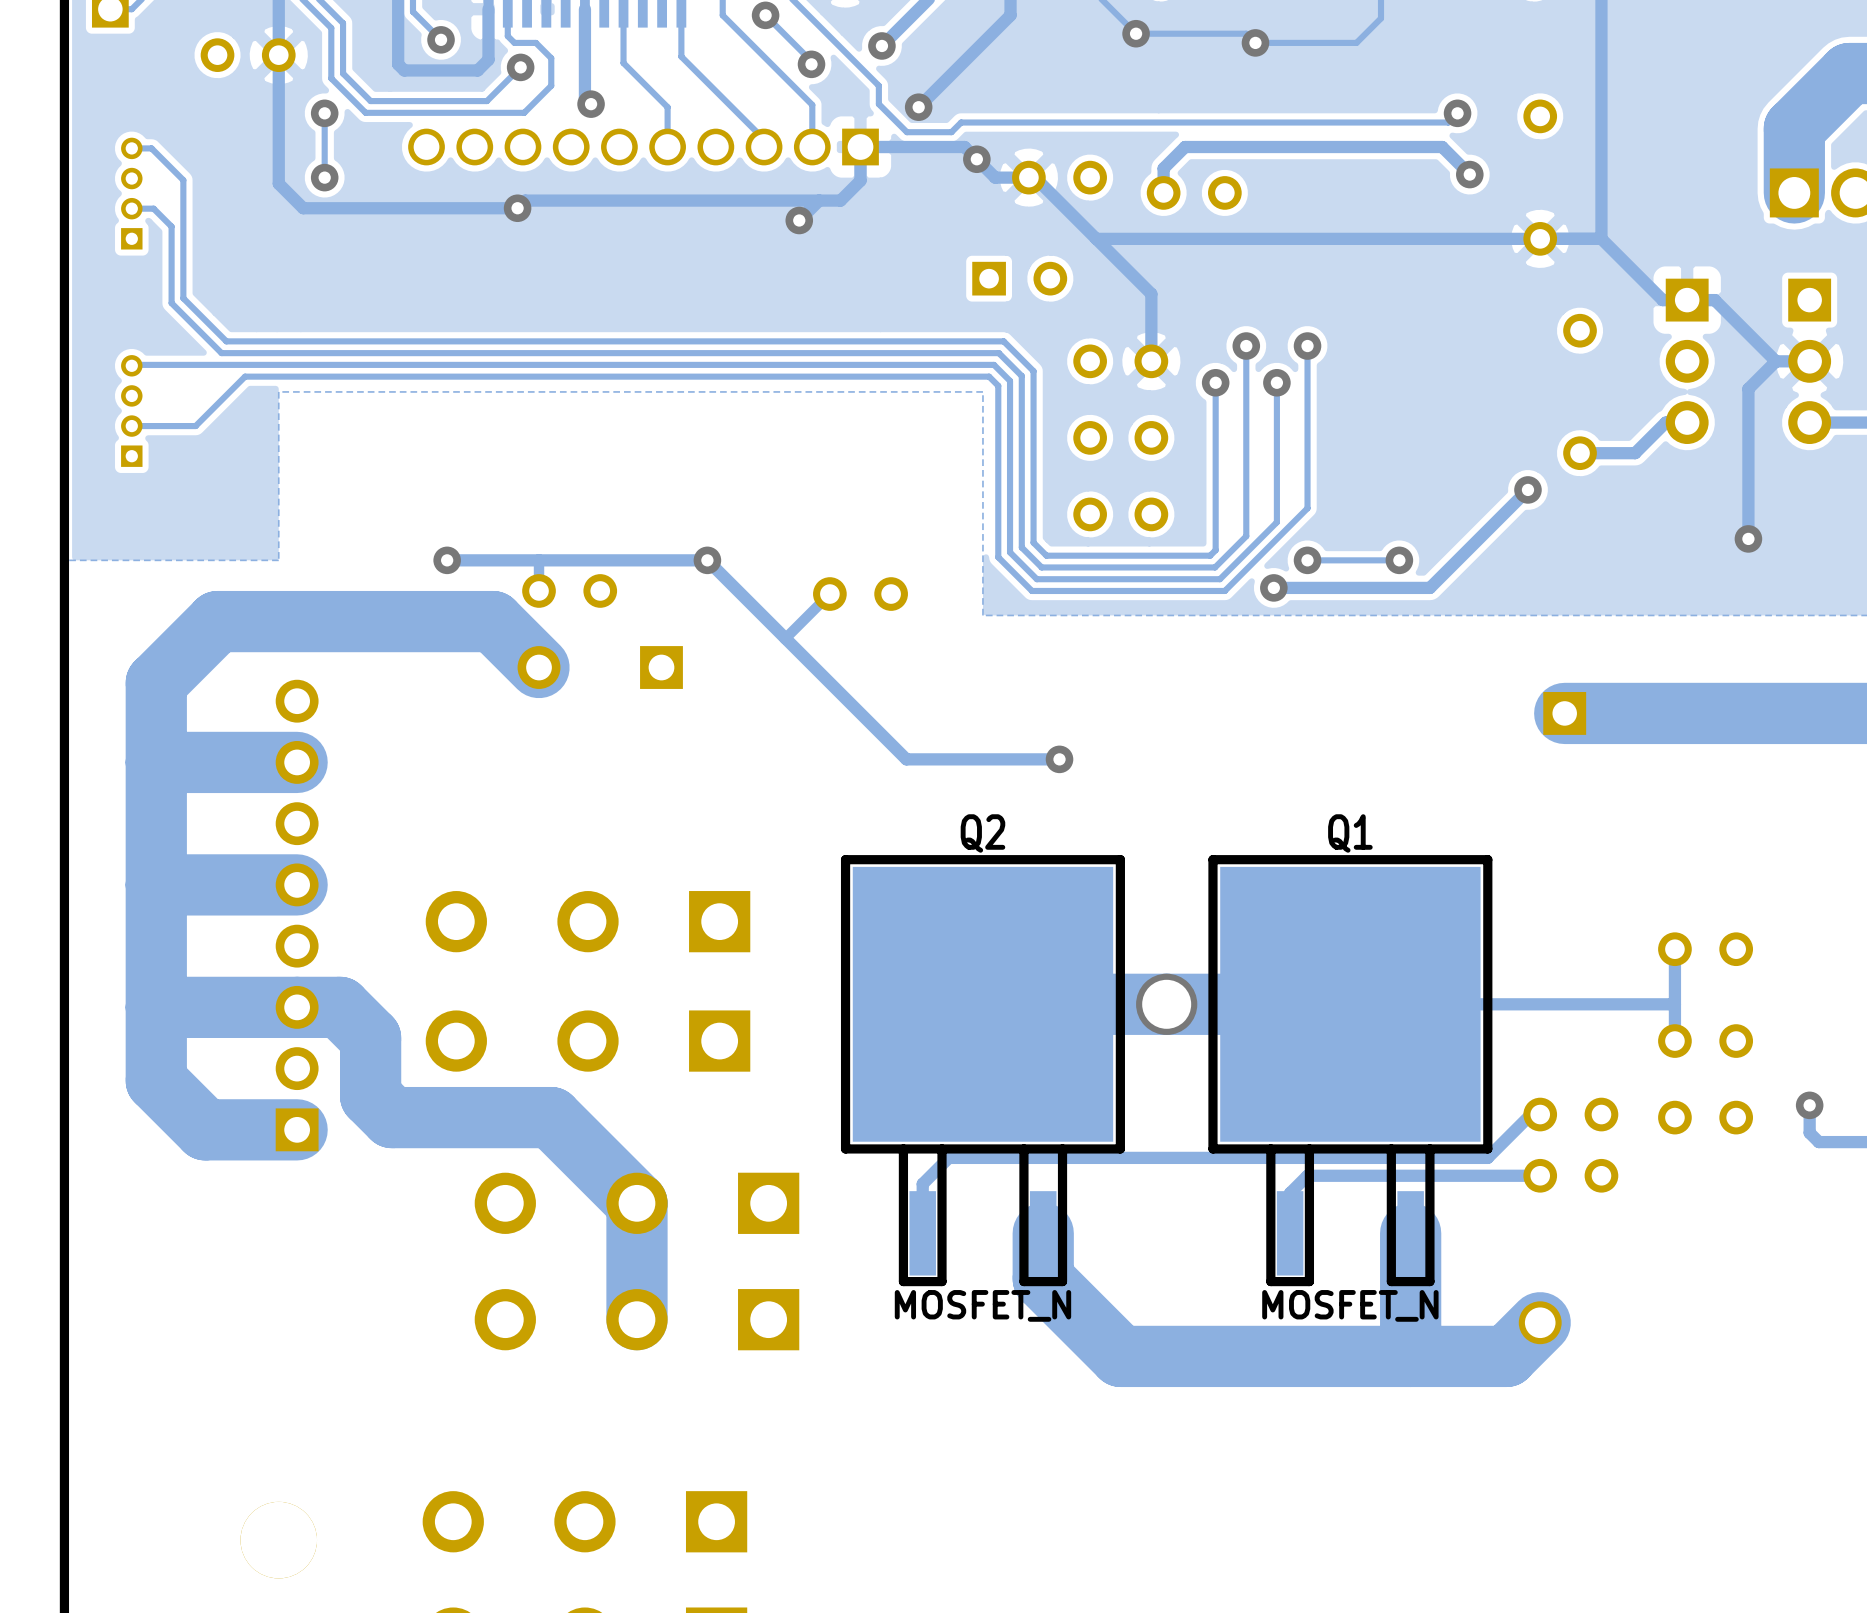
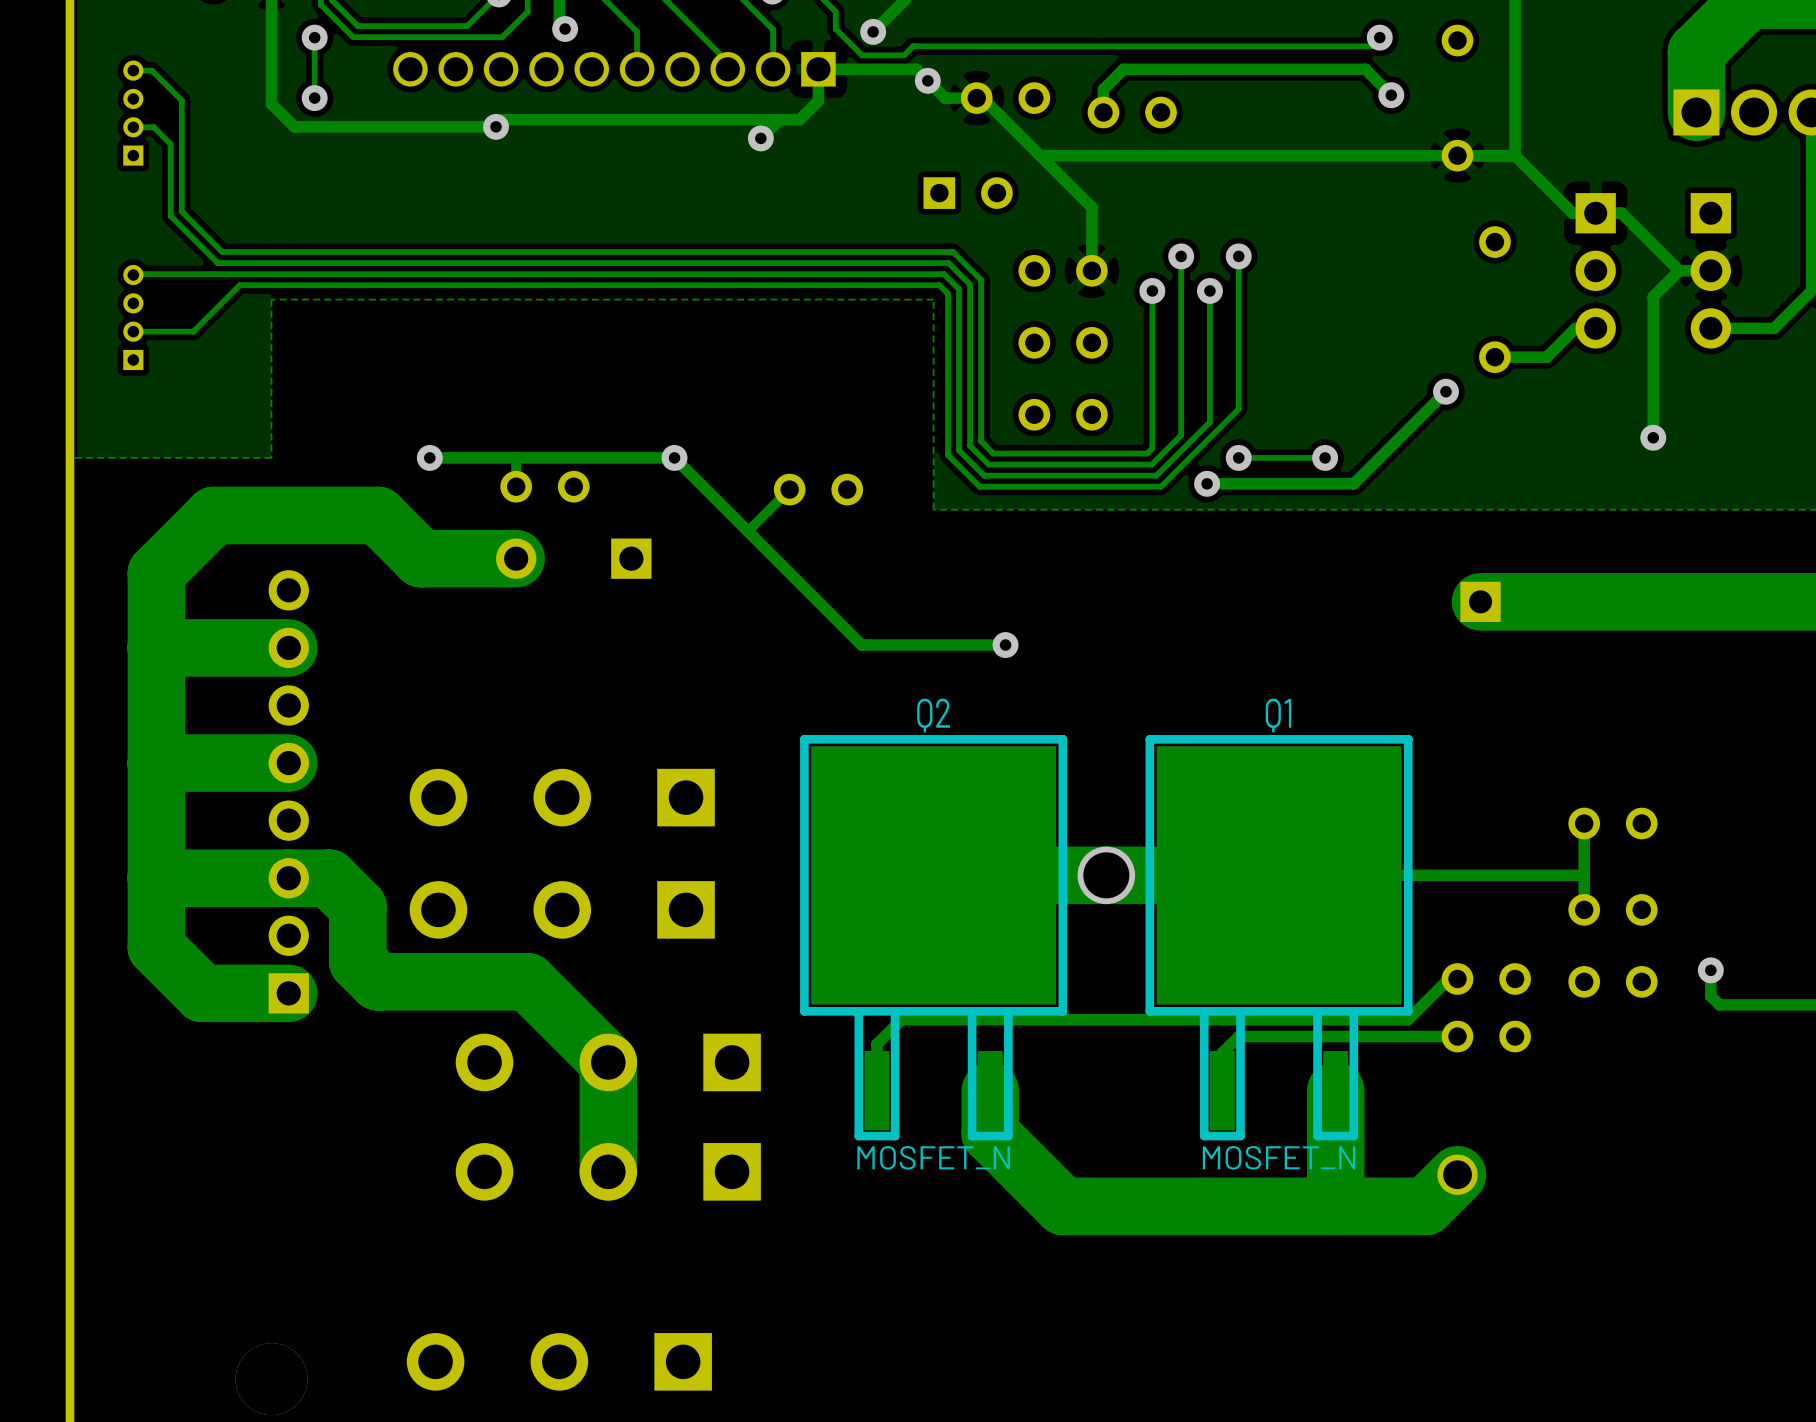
track: (392, 621) (493, 621) (539, 667) -> (378, 515) (421, 558) (516, 558)

